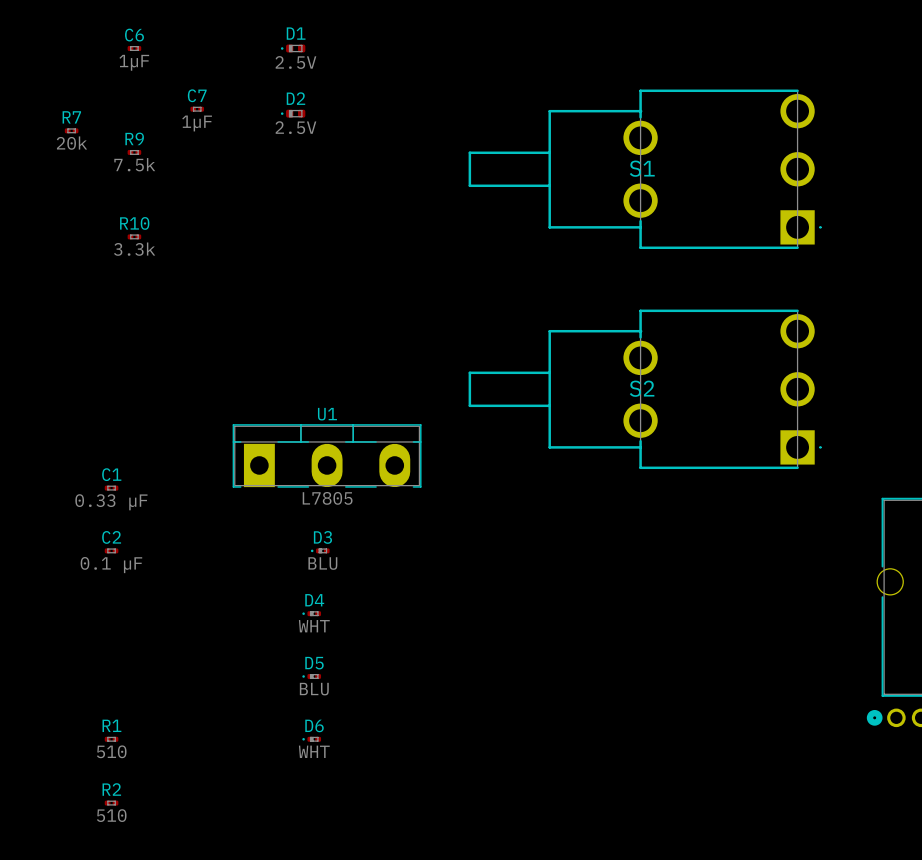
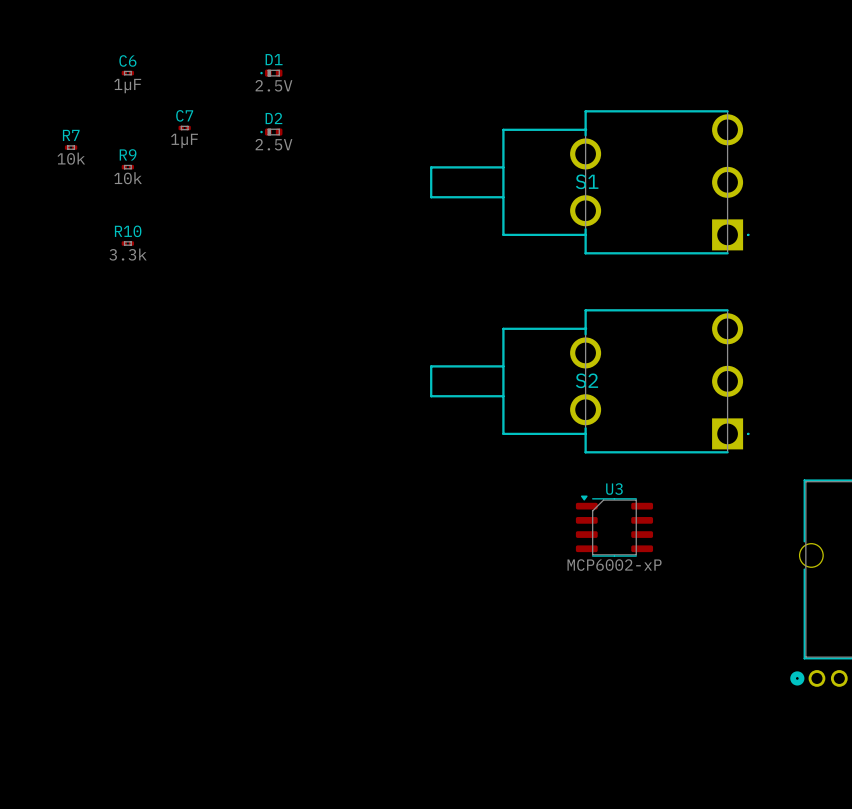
R7 value: 20k (71, 143) -> 10k (71, 158)
R9 value: 7.5k (134, 164) -> 10k (128, 178)
U1: L7805 (327, 455) -> none
C1: 0.33 µF (111, 488) -> none
U3: none -> MCP6002-xP (614, 526)
C2: 0.1 µF (111, 550) -> none
D3: BLU (320, 550) -> none
D4: WHT (311, 613) -> none
D5: BLU (311, 676) -> none
R1: 510 (111, 739) -> none
D6: WHT (311, 739) -> none
R2: 510 (111, 803) -> none

